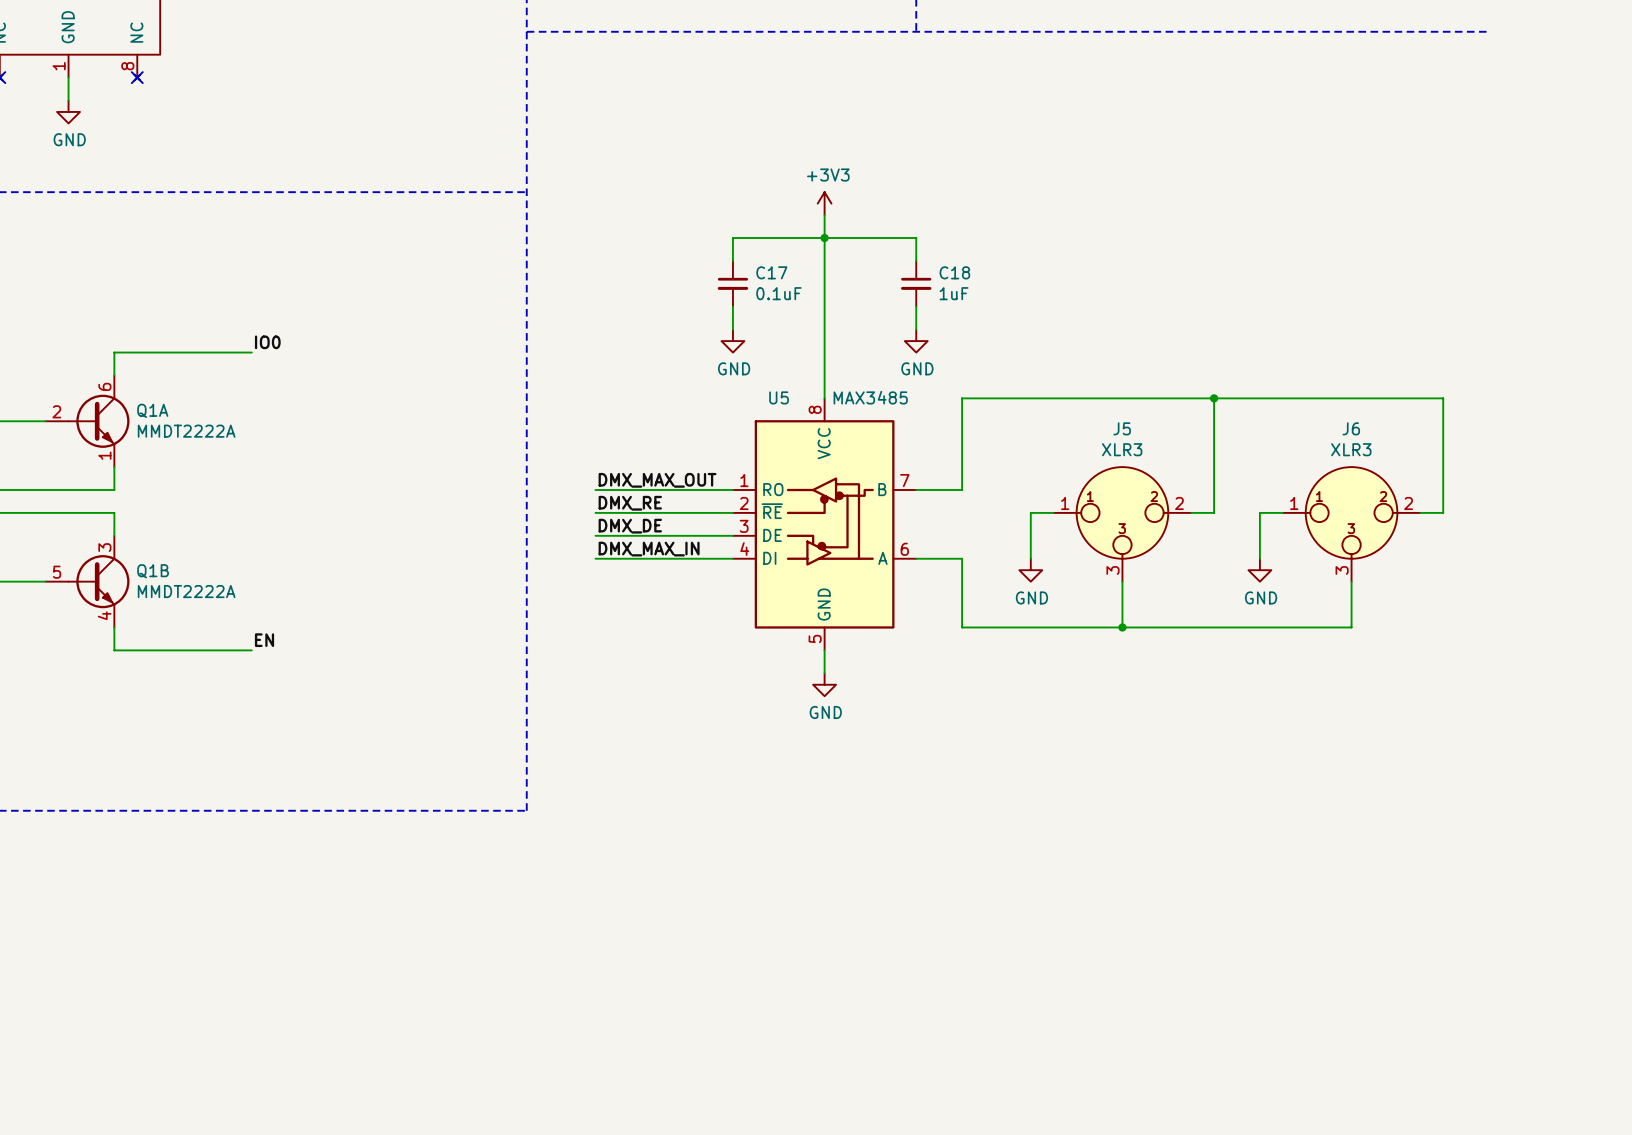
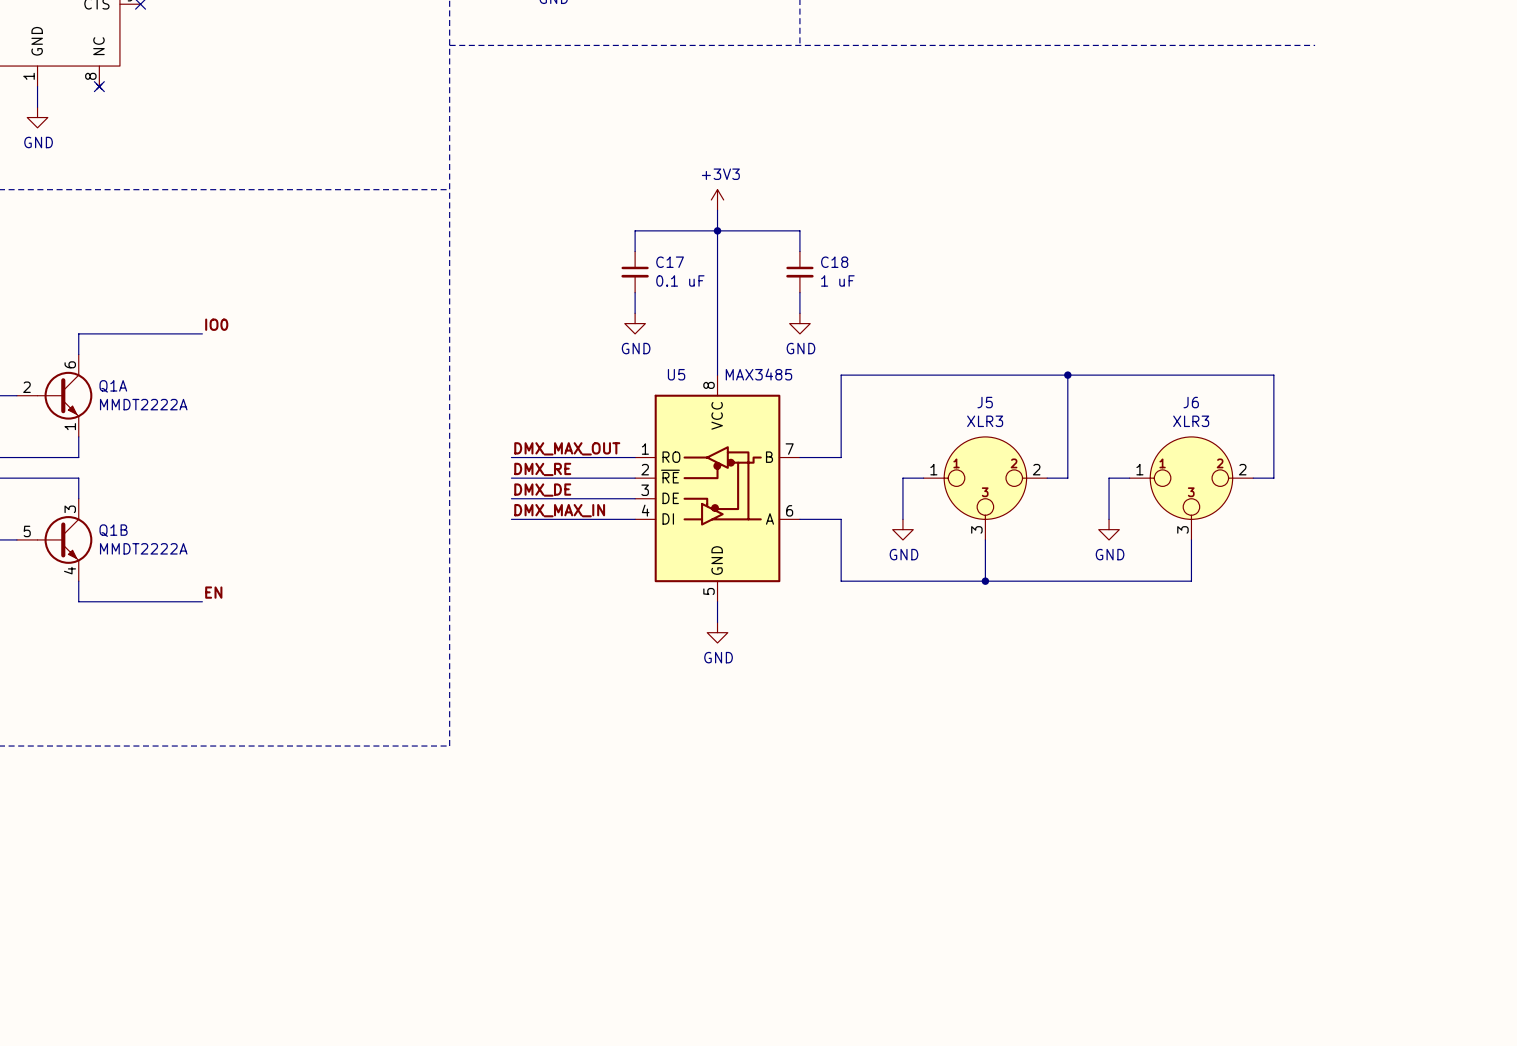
C17 value: 0.1uF (778, 293) -> 0.1 uF (680, 280)
C18 value: 1uF (954, 293) -> 1 uF (837, 280)

